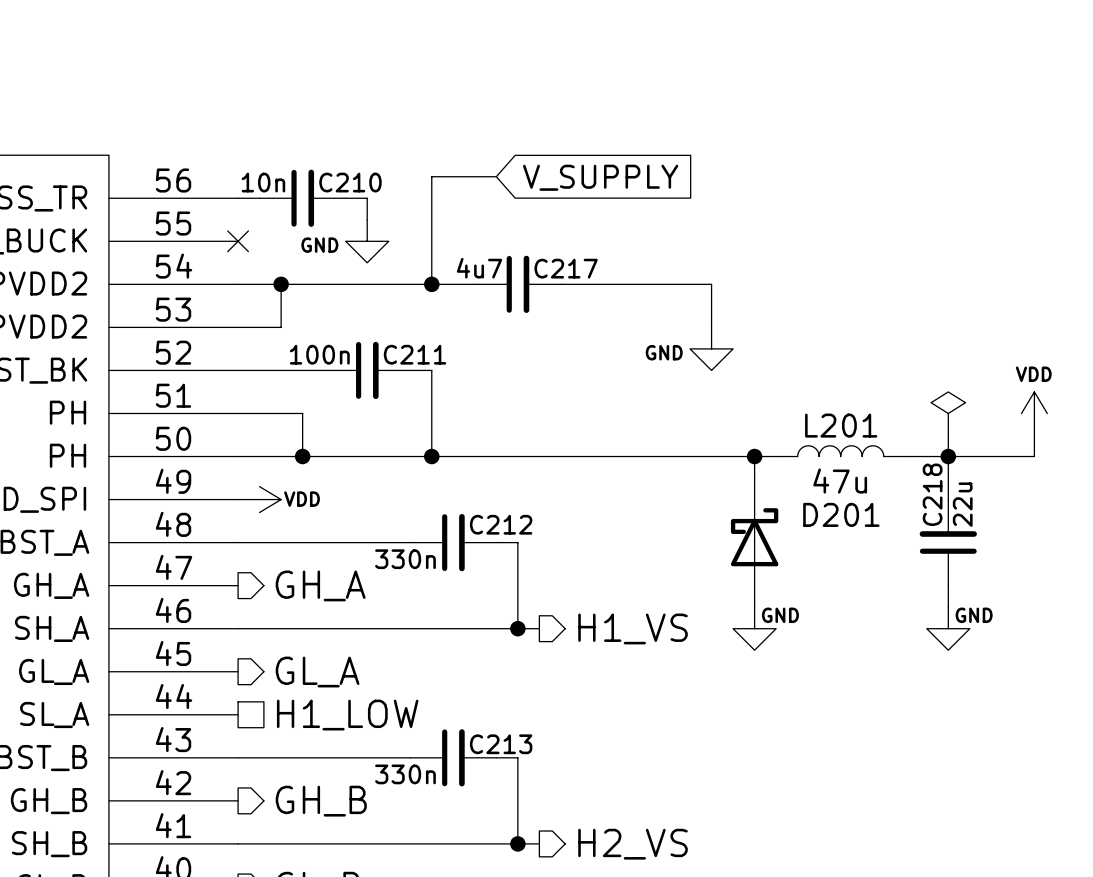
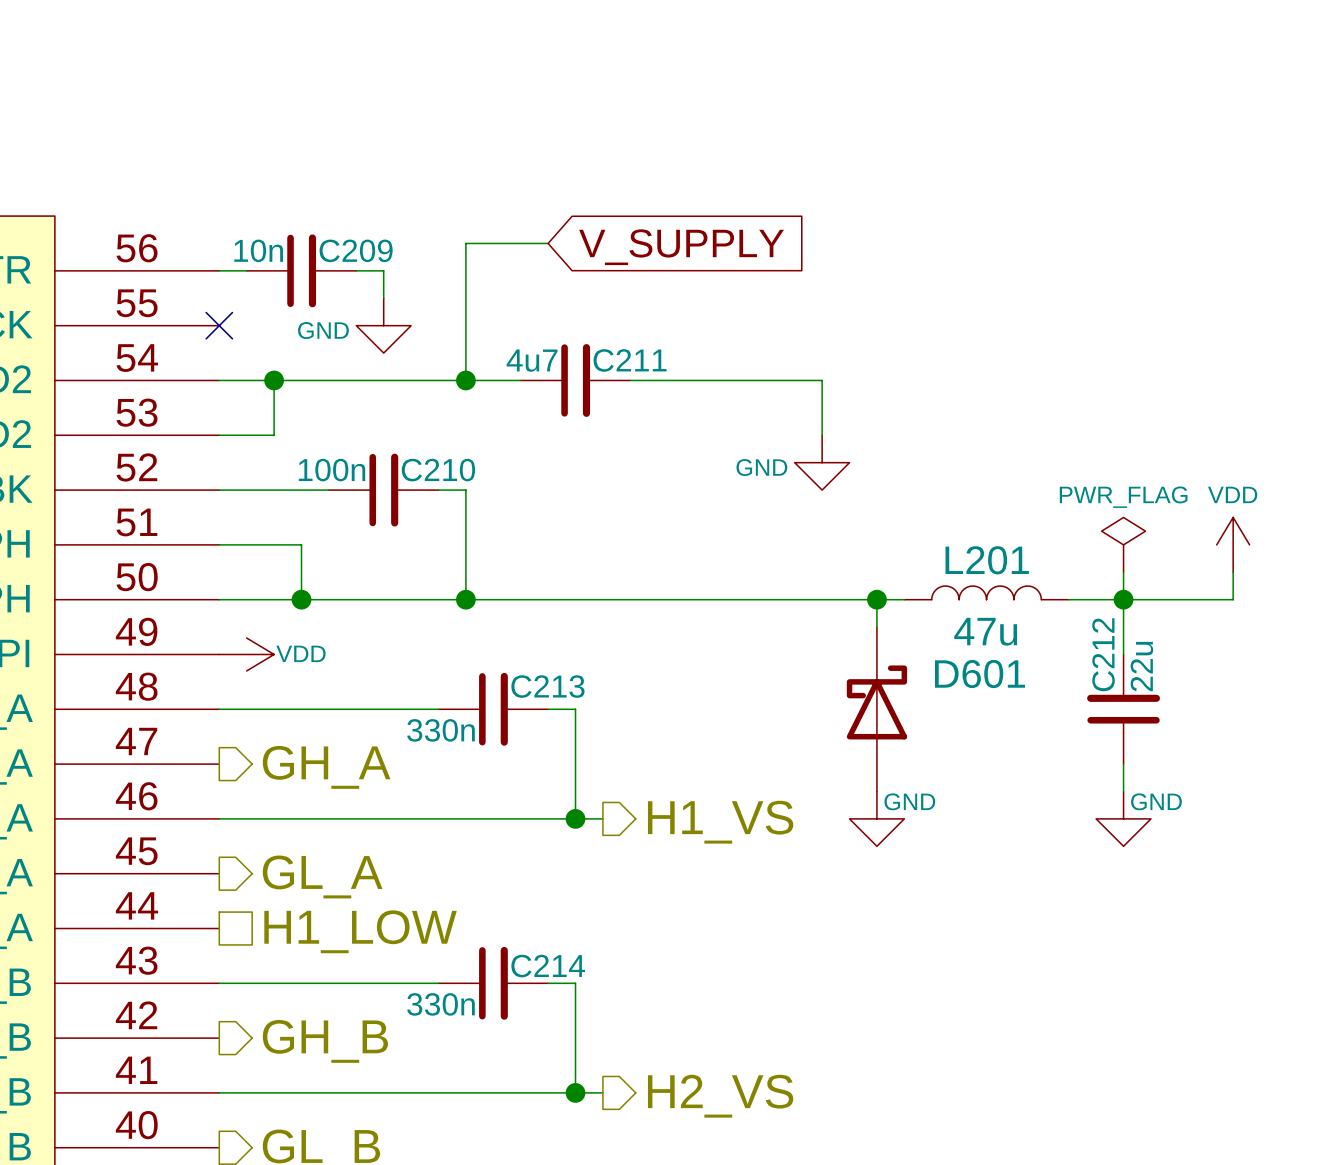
C210 name: C210 (350, 182) -> C209 (356, 250)
C217 name: C217 (566, 268) -> C211 (630, 360)
C211 name: C211 (415, 354) -> C210 (438, 470)
power symbol text: none -> PWR_FLAG (1123, 497)
C218 name: C218 (932, 494) -> C212 (1103, 654)
D201 name: D201 (841, 514) -> D601 (980, 674)
C212 name: C212 (501, 524) -> C213 (547, 686)
C213 name: C213 (501, 744) -> C214 (548, 966)

